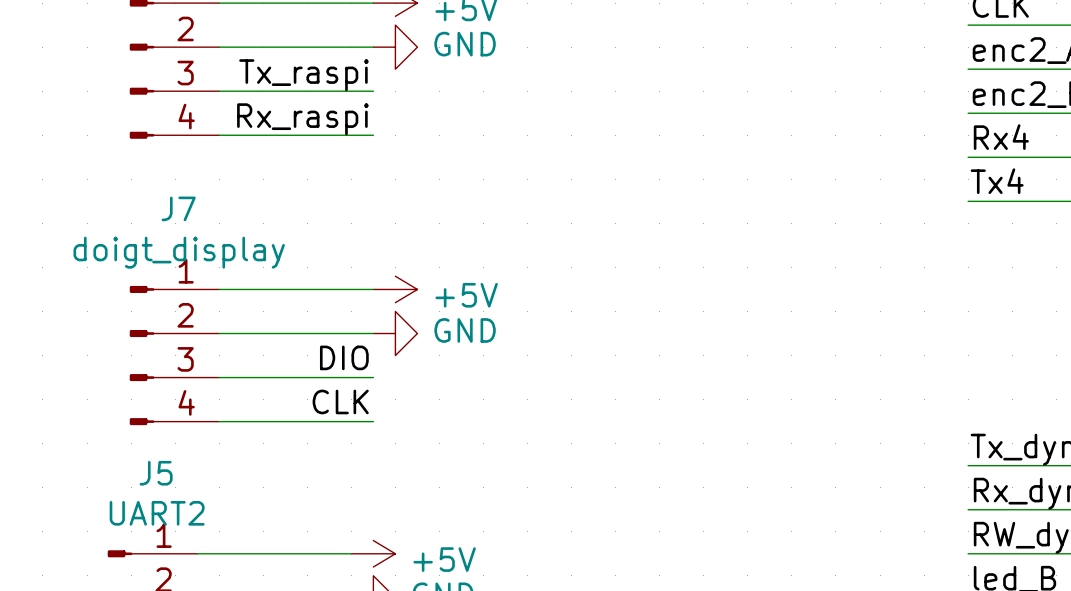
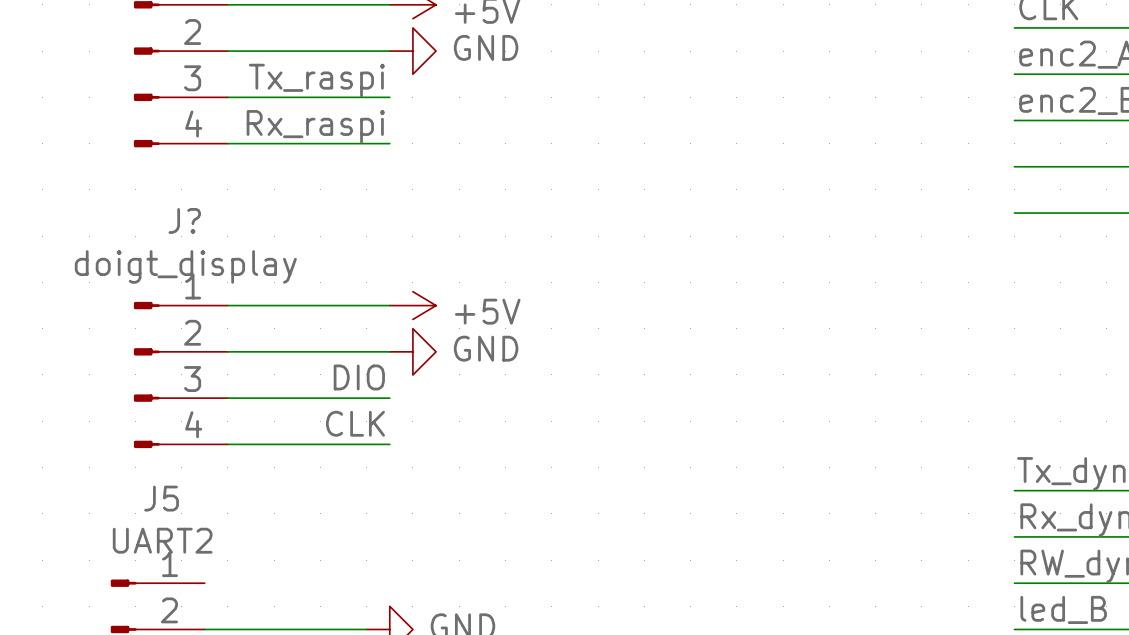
label: Rx4 (1001, 137) -> none
label: Tx4 (997, 181) -> none
J7 name: J7 (178, 208) -> J? (184, 220)
wire: (197, 553) (351, 553) -> none
power symbol: +5V (373, 553) -> none

